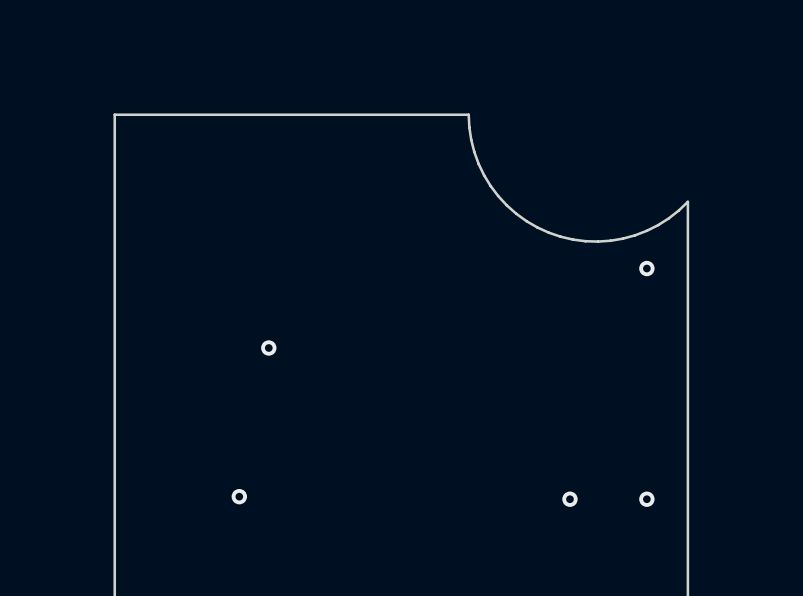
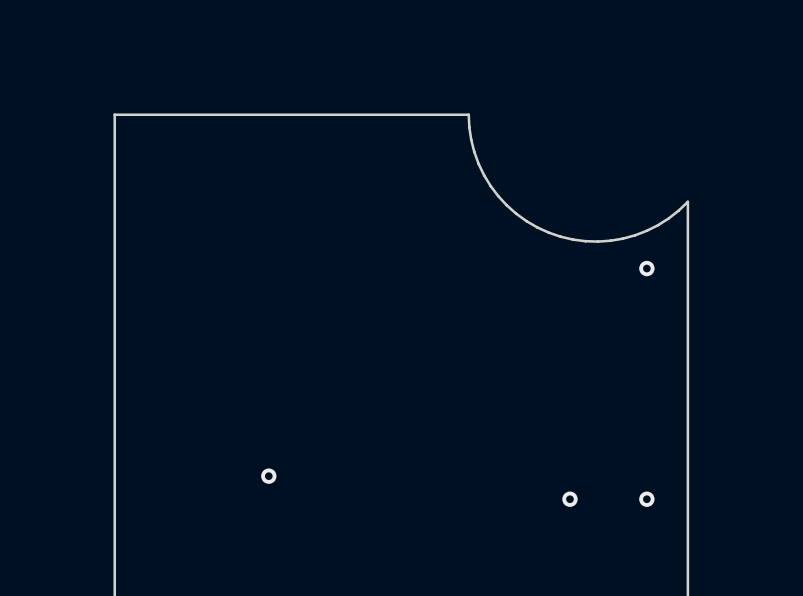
via: (268, 347) -> none
via position: (239, 496) -> (268, 476)

